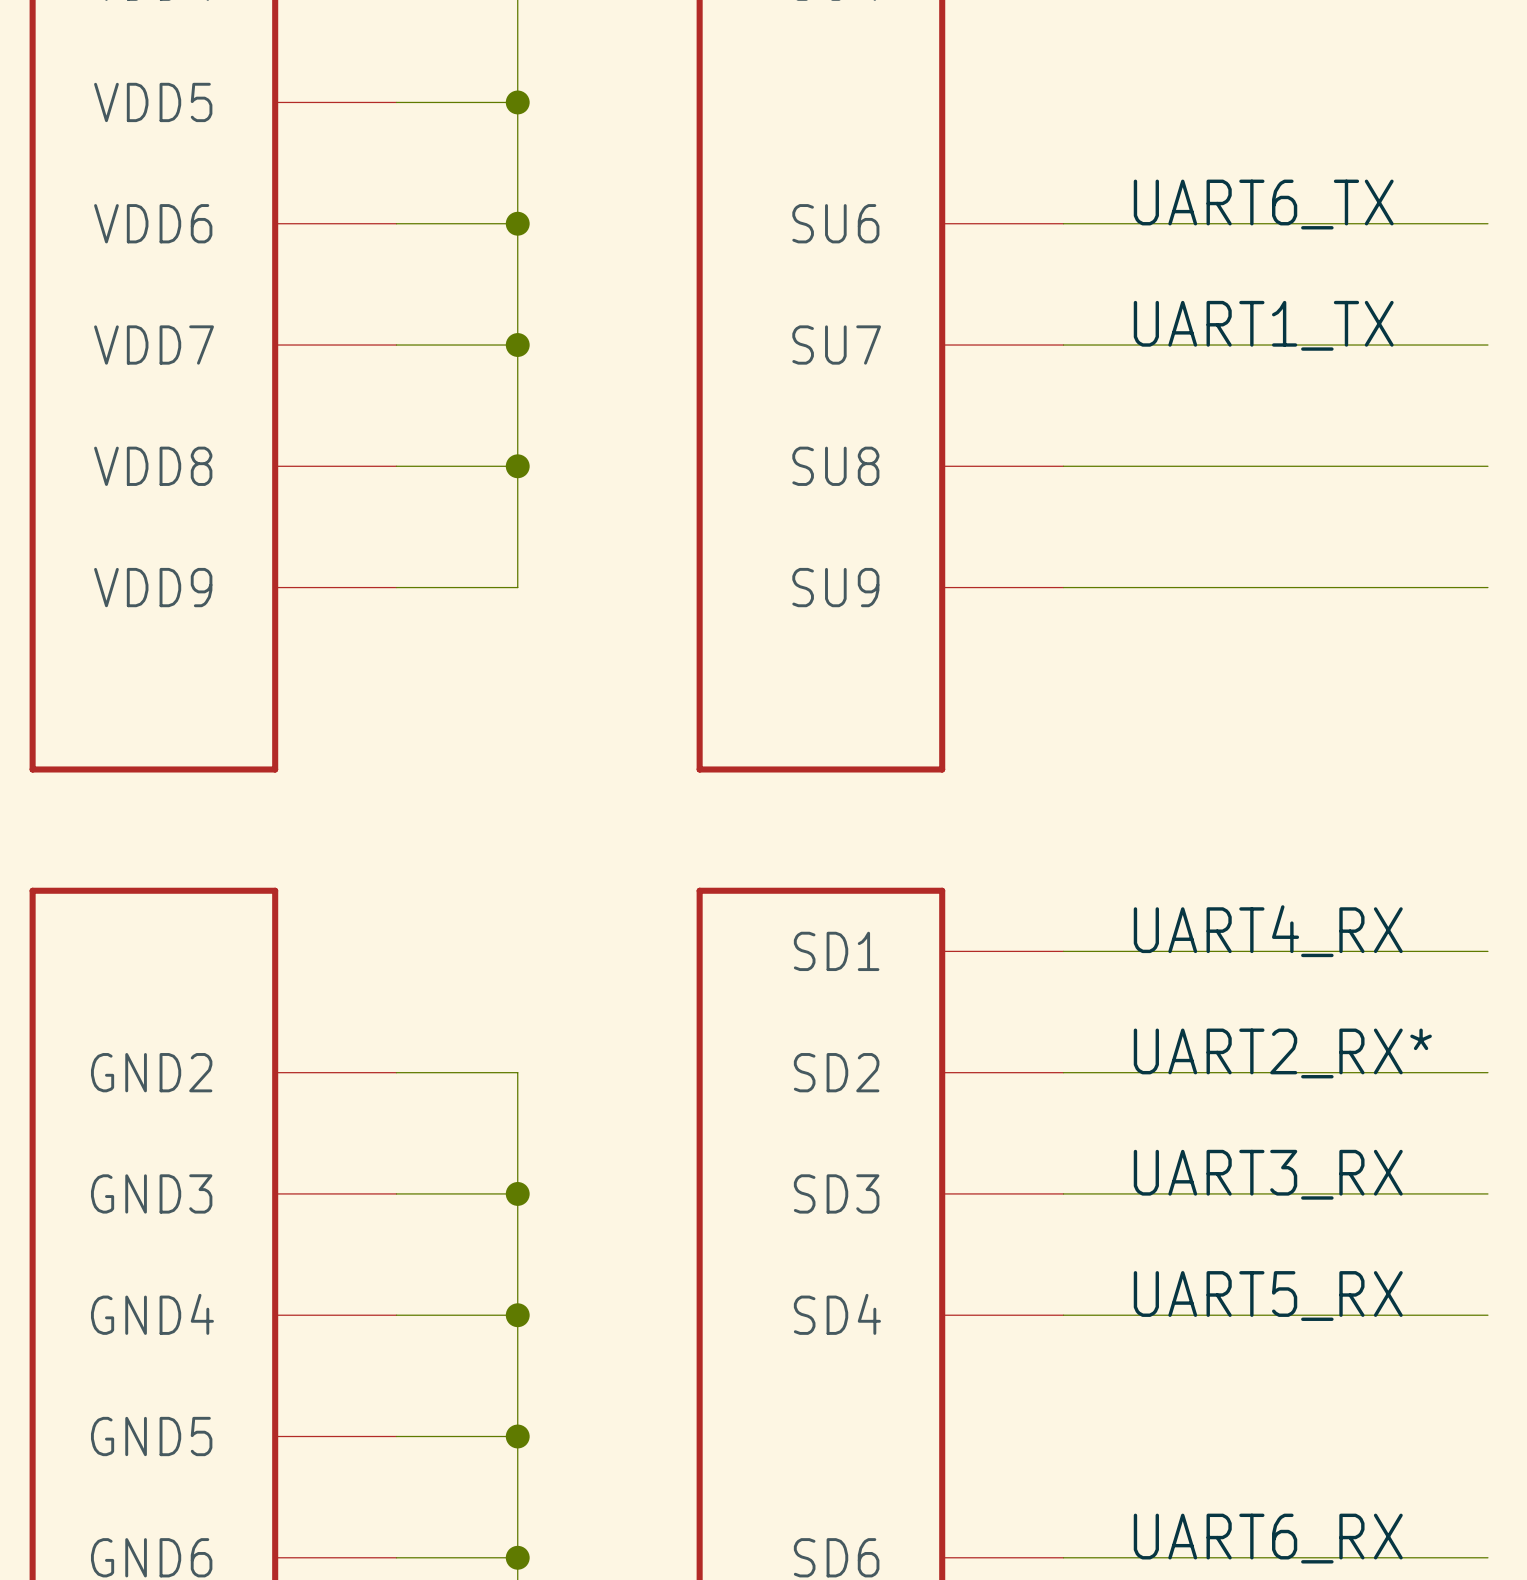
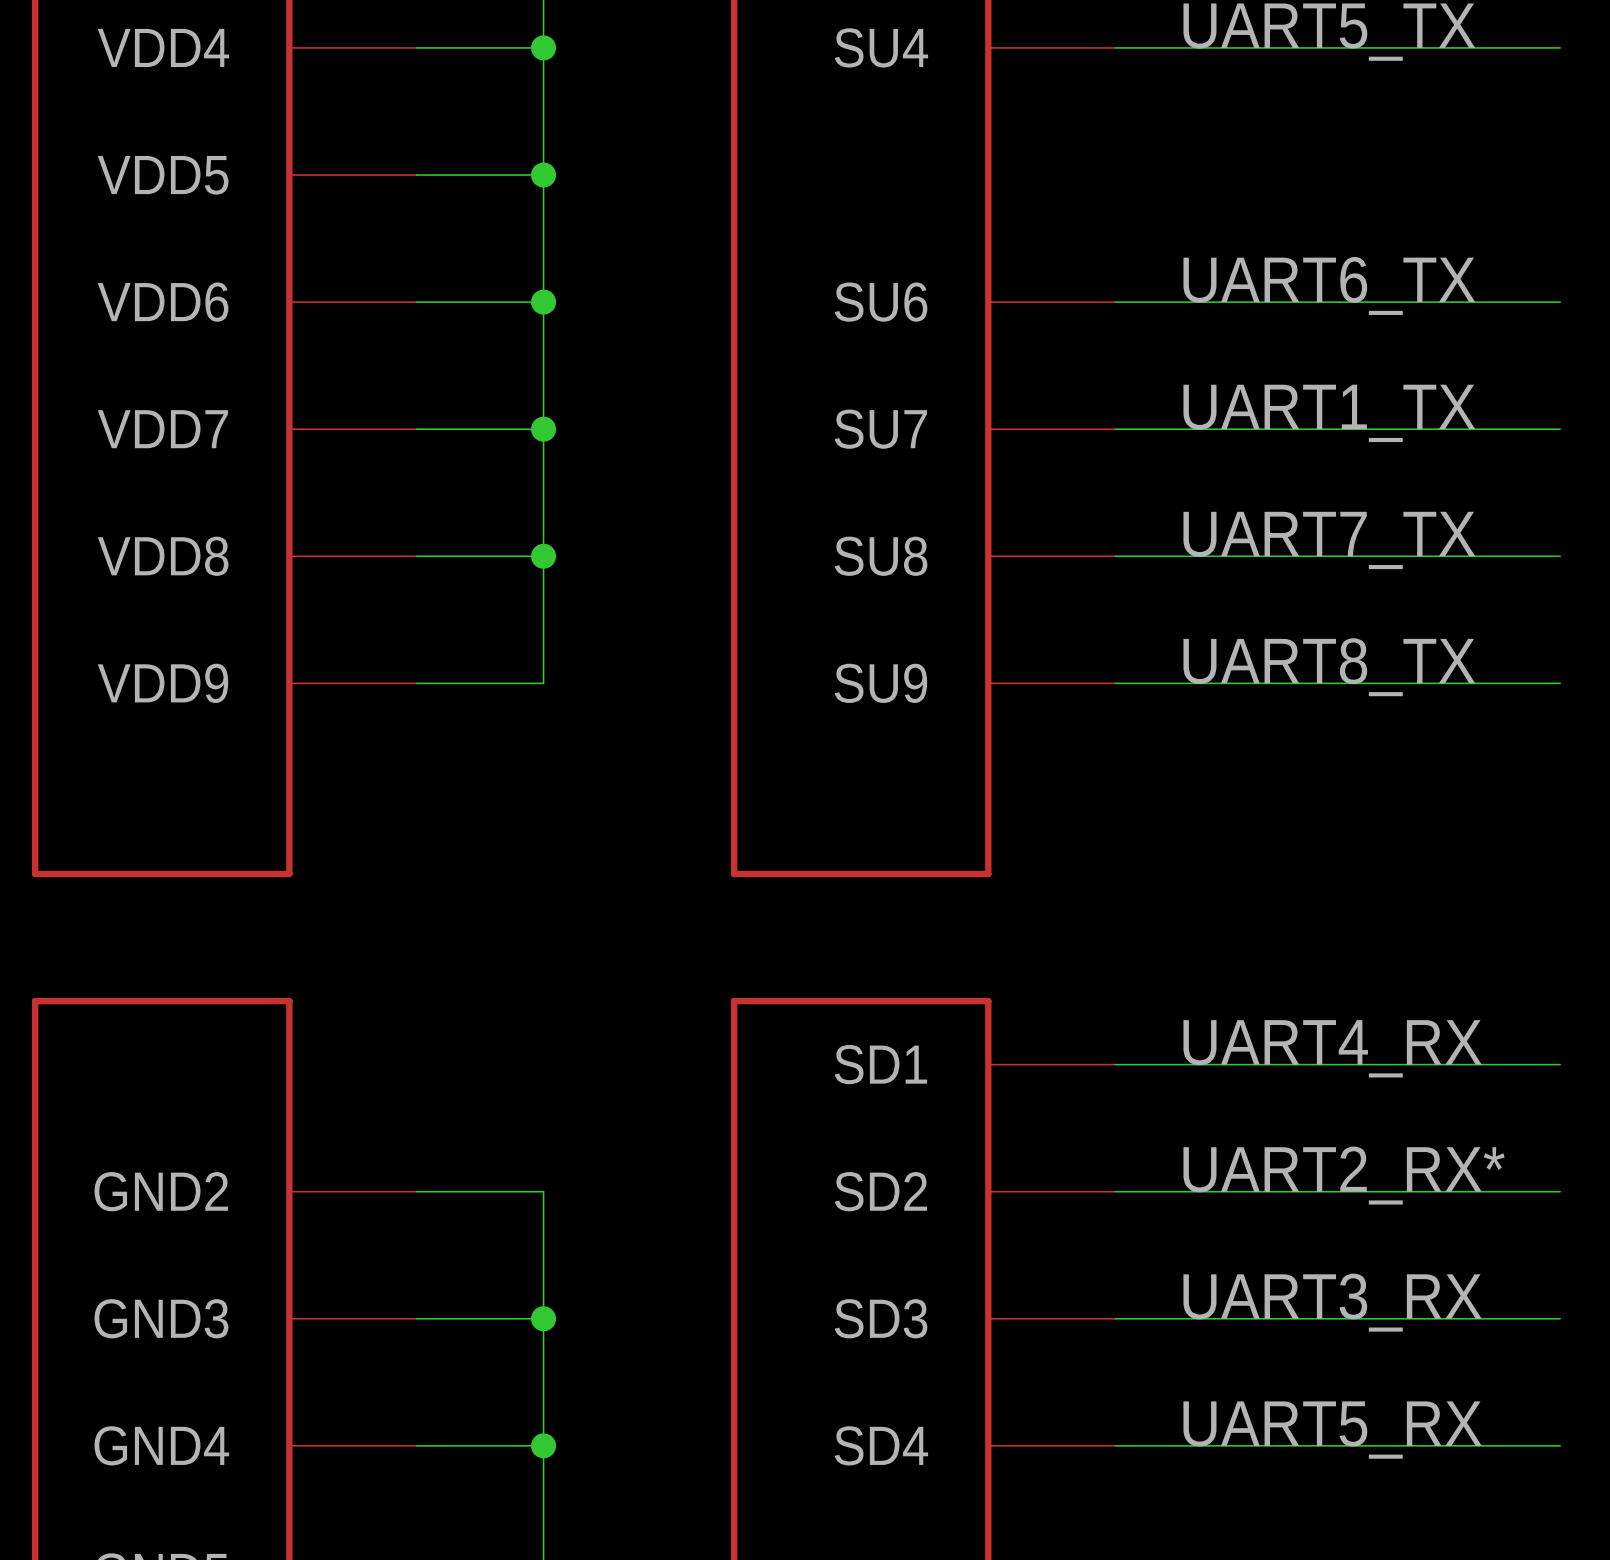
label: none -> UART7_TX (1329, 540)
label: none -> UART8_TX (1329, 667)

